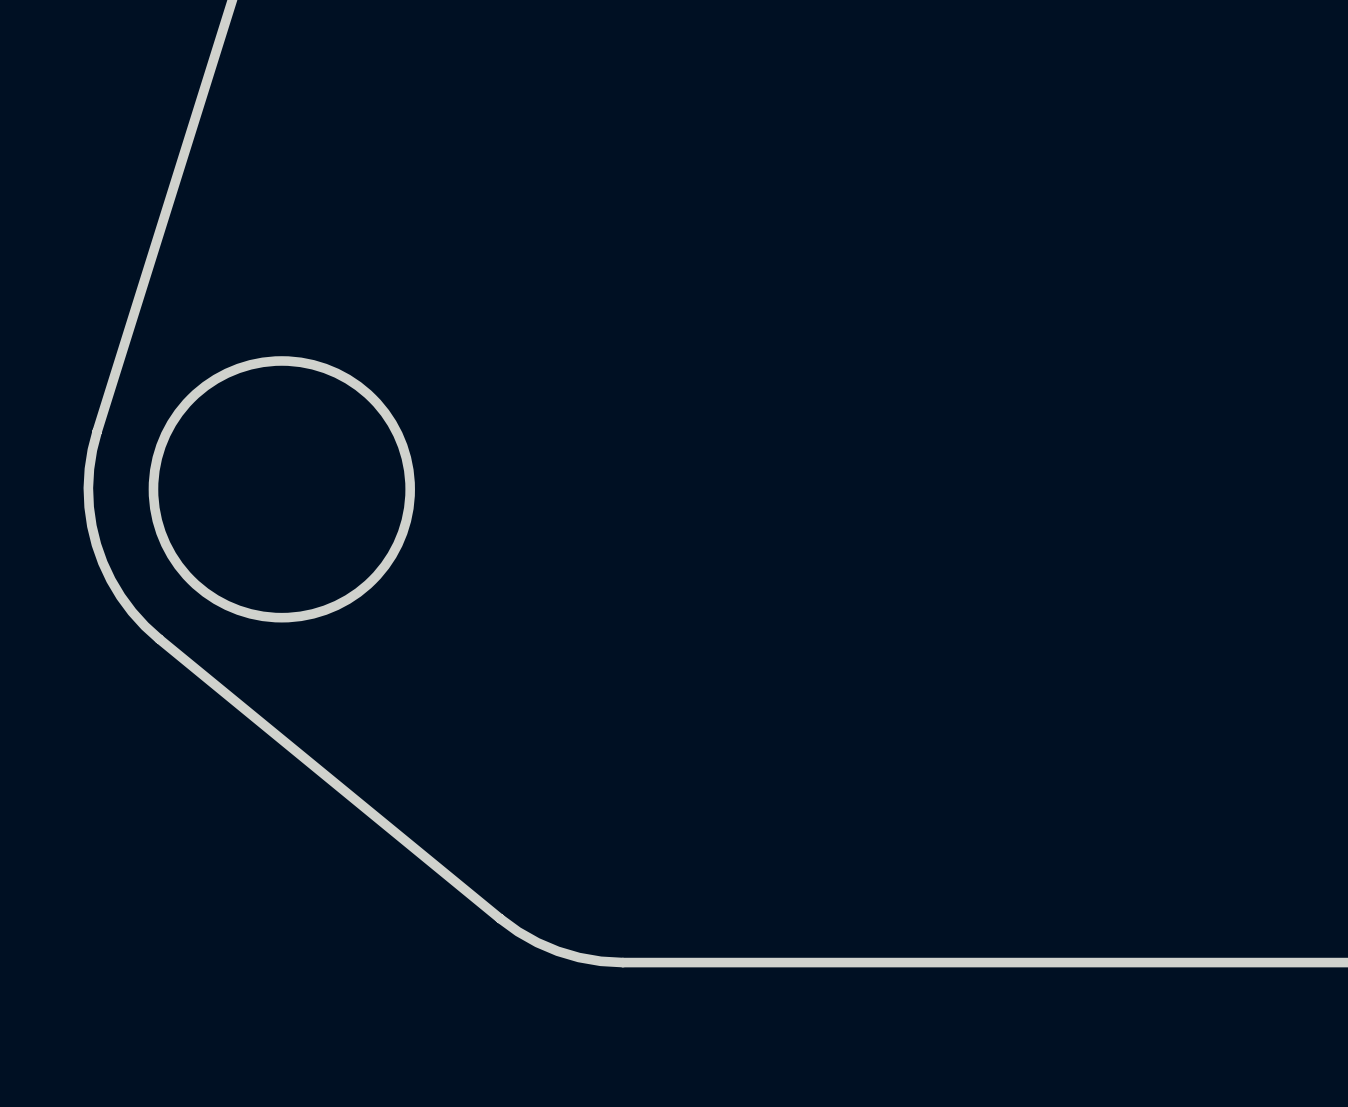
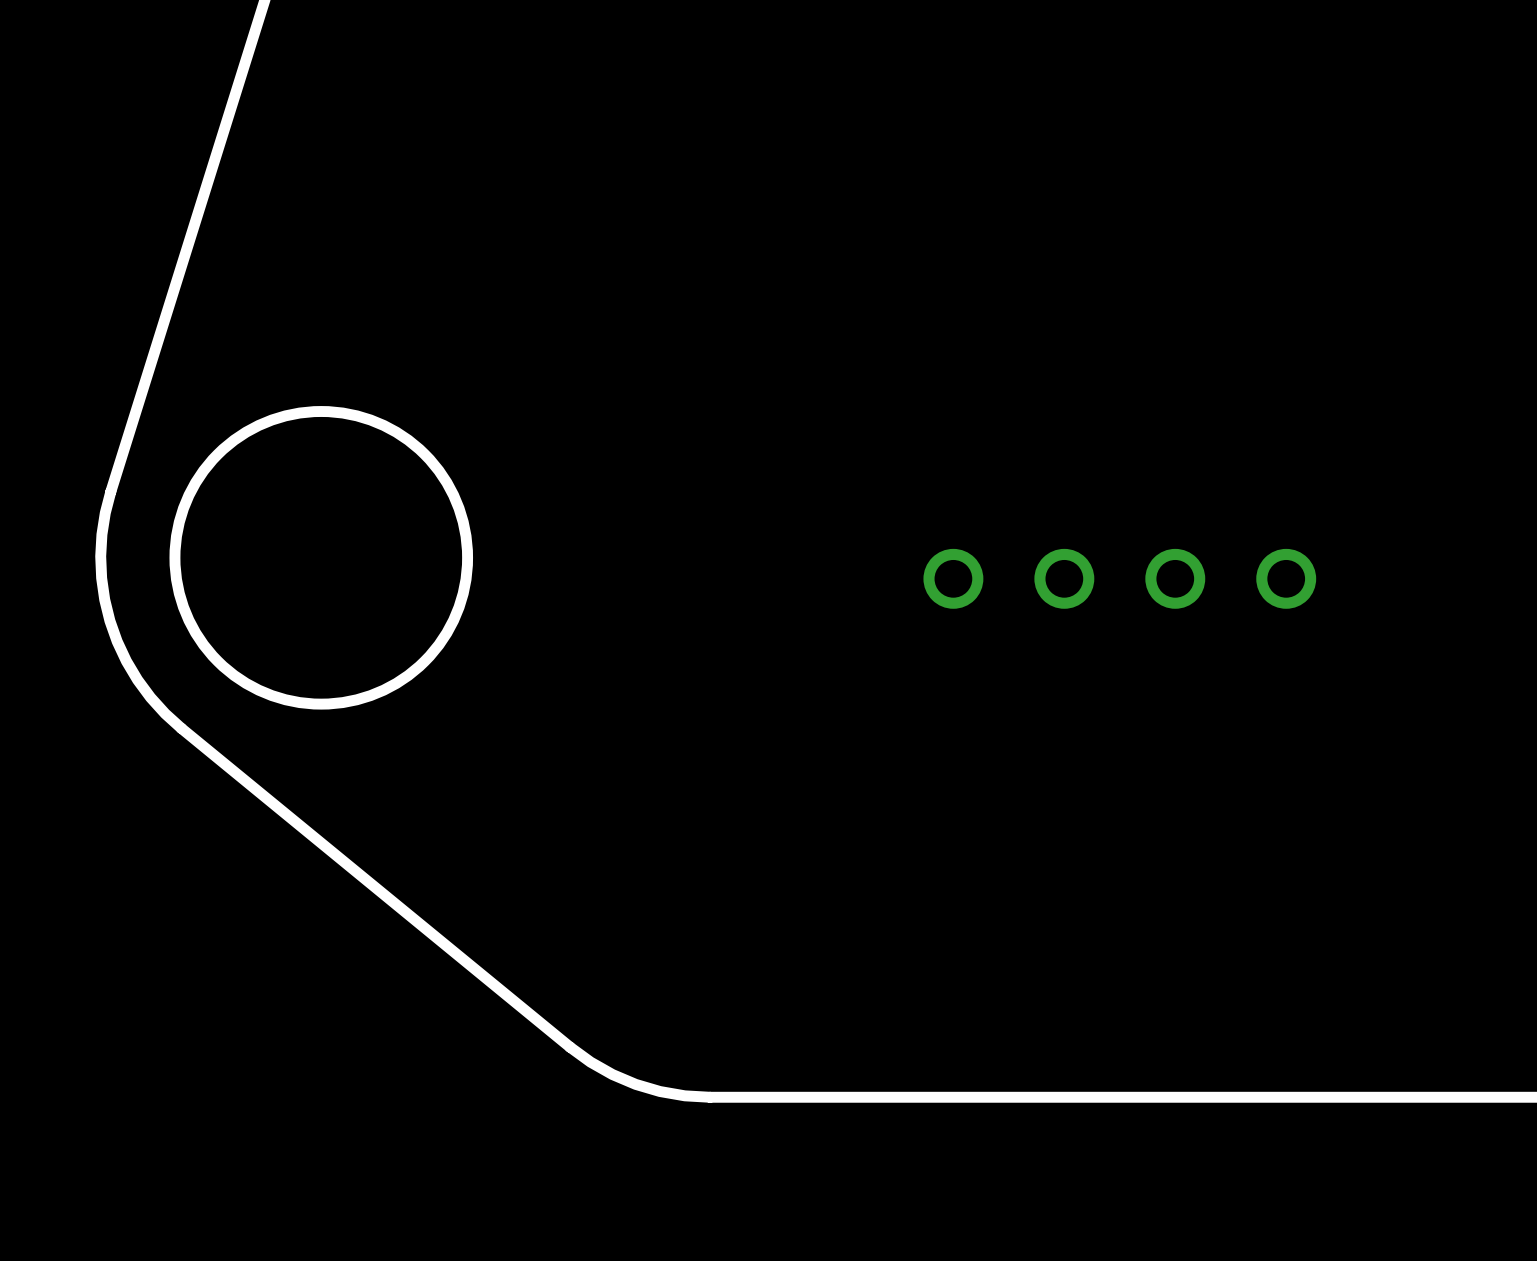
part: none -> (1119, 578)

